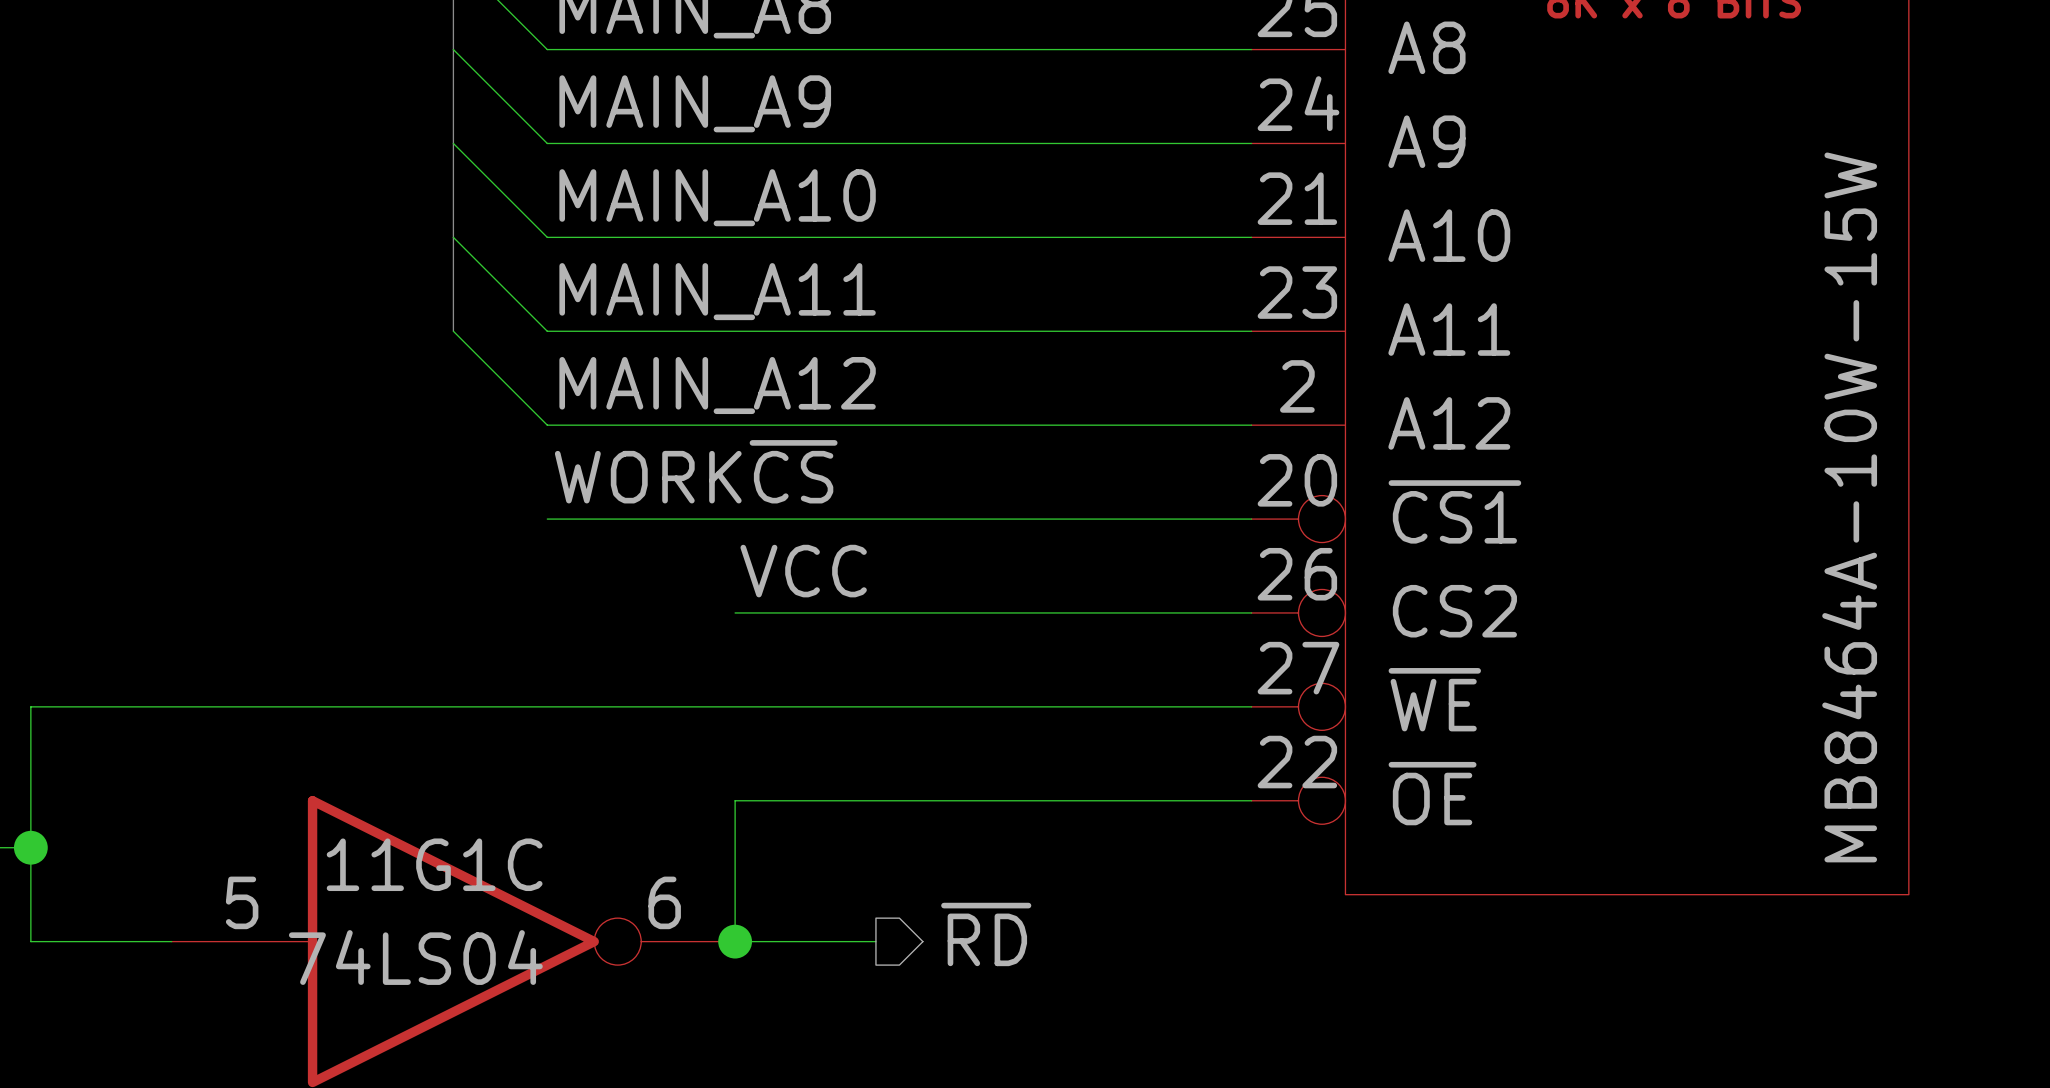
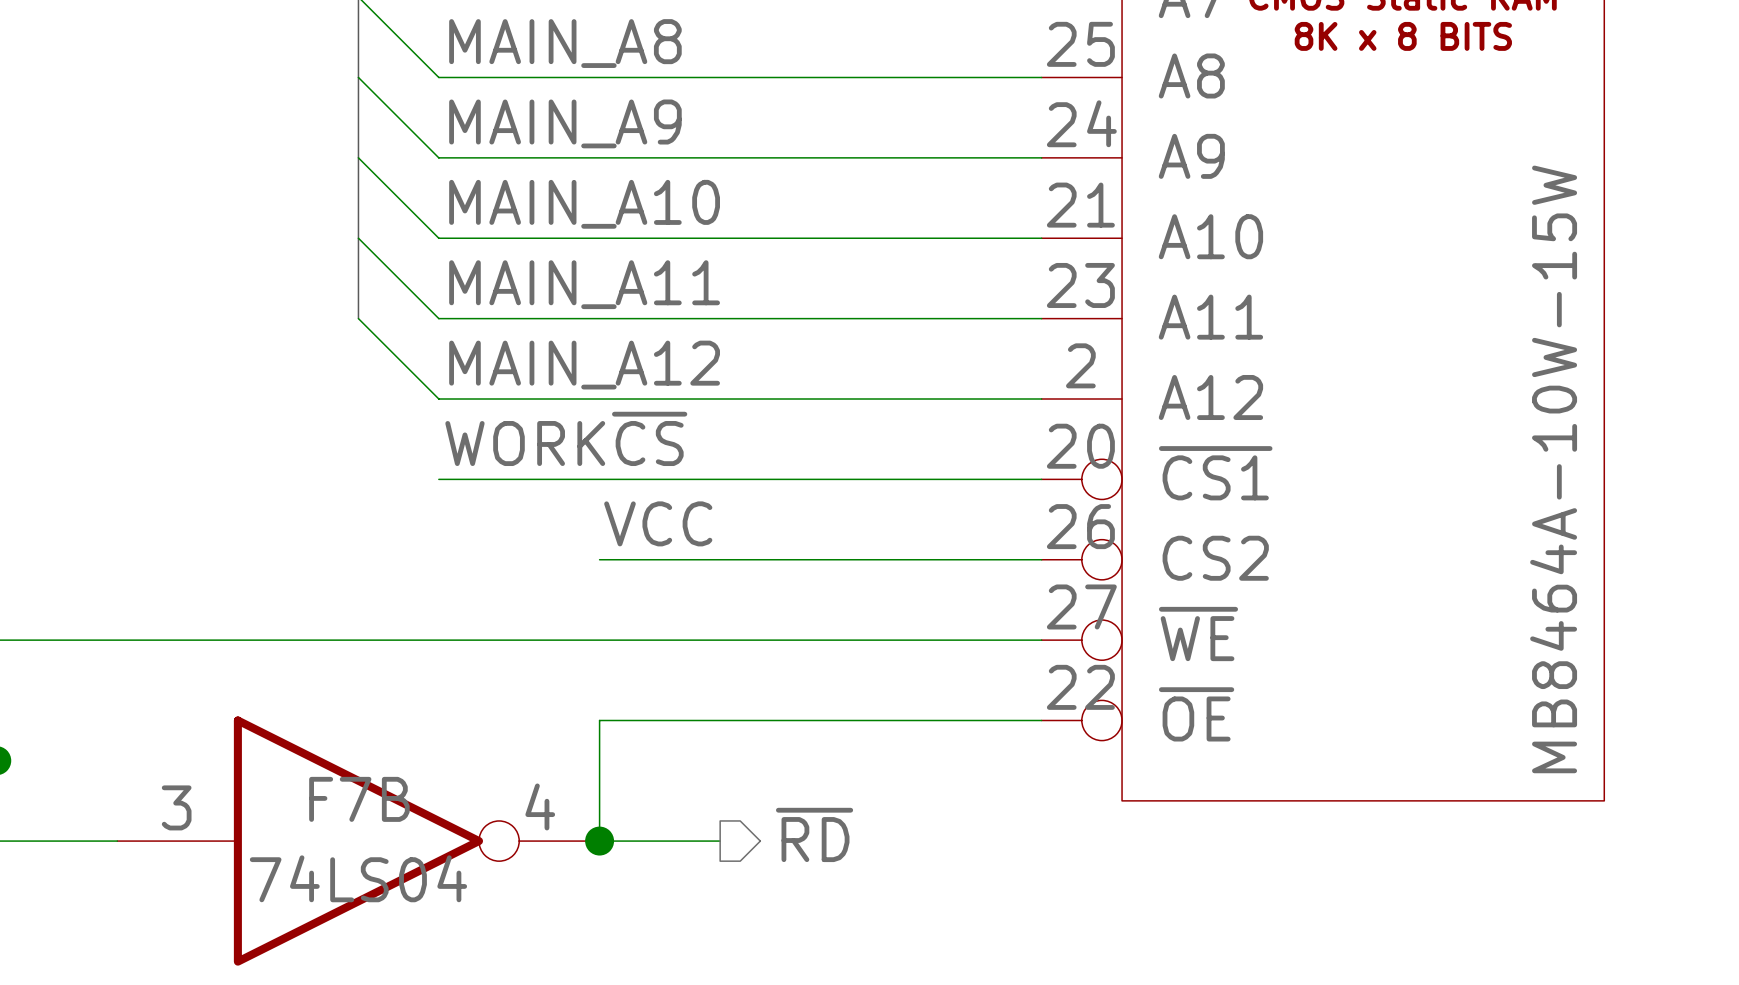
11G1C name: 11G1C (434, 864) -> F7B (359, 799)
11G1C pin number: 5 (242, 902) -> 3 (176, 807)
11G1C pin number: 6 (664, 902) -> 4 (540, 806)
11G1C value position: 74LS04 (415, 957) -> 74LS04 (358, 878)

